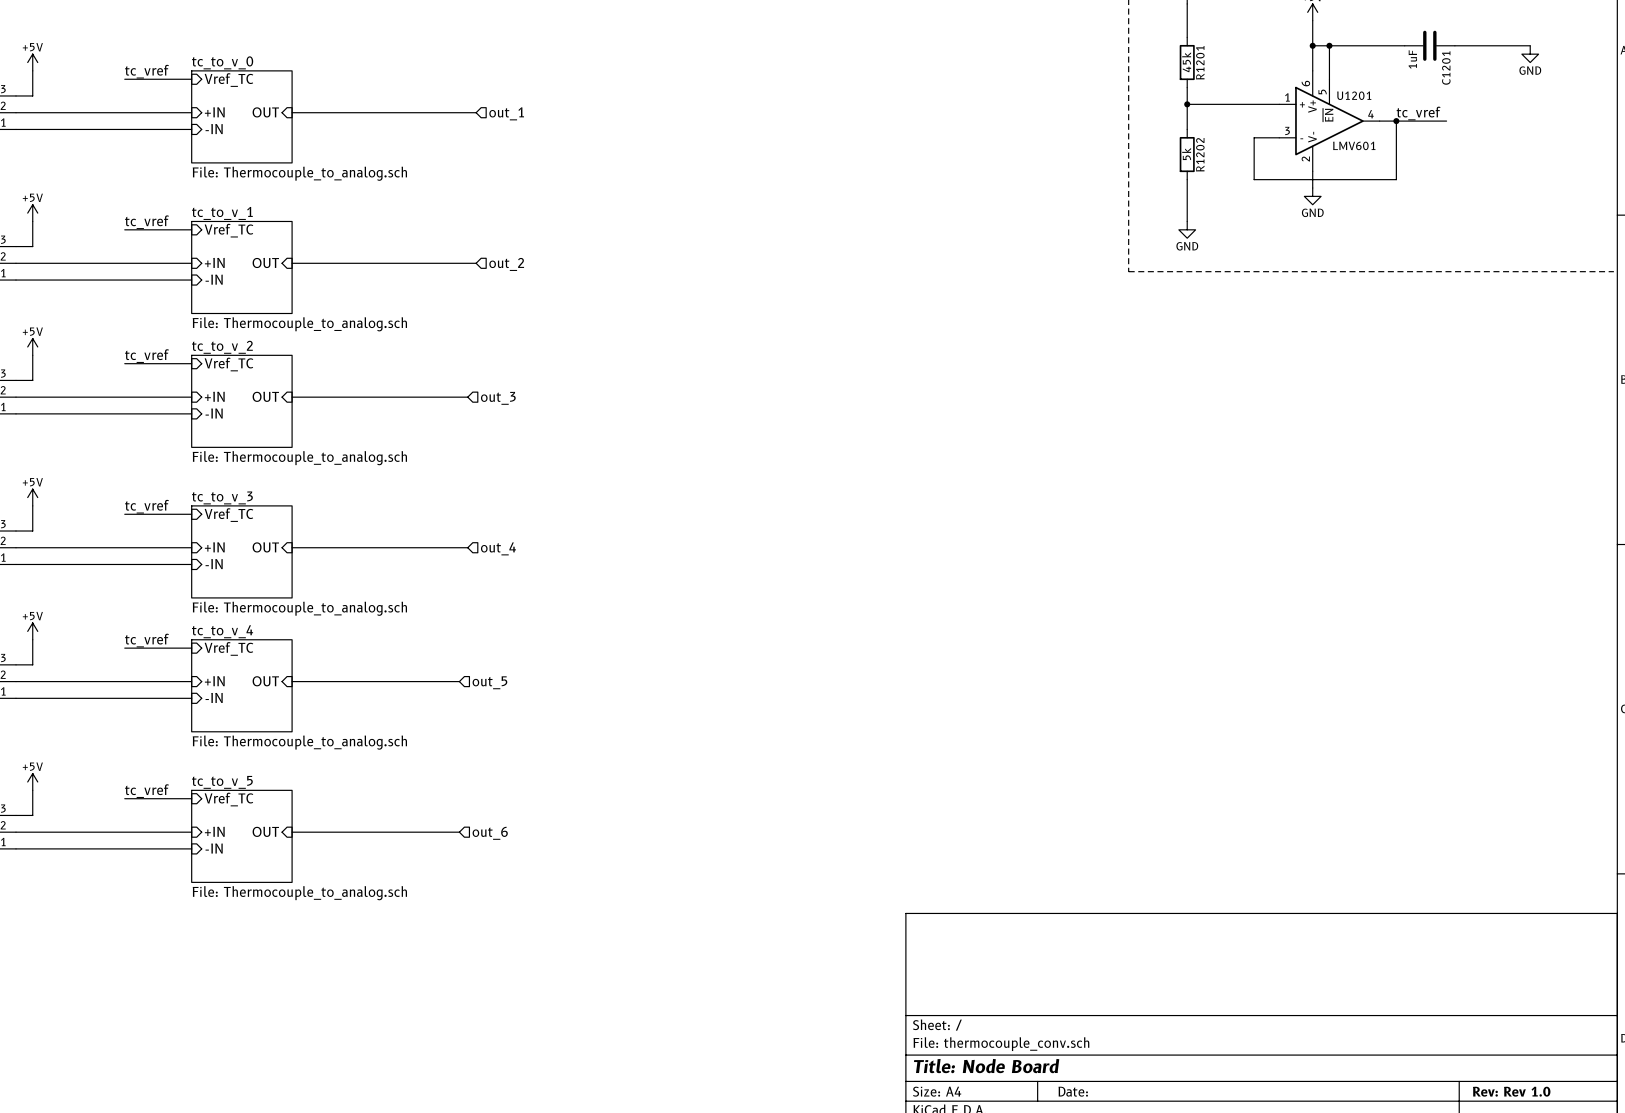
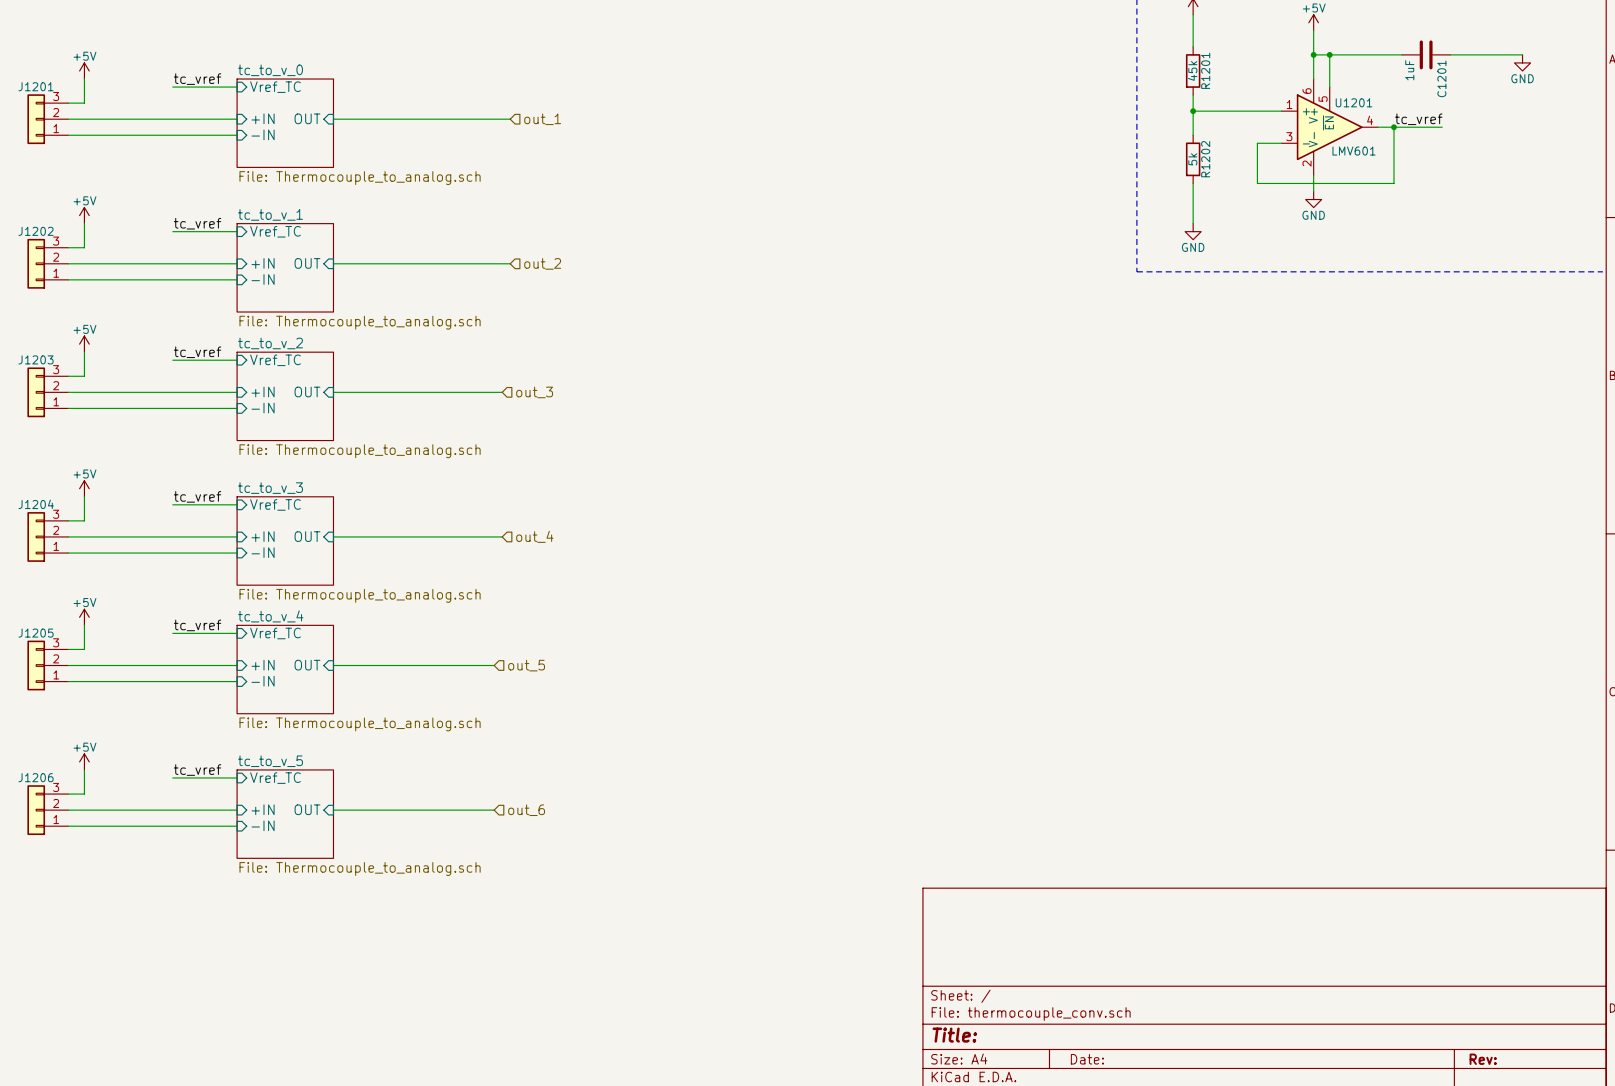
title block: Title: Node Board (986, 1066) -> Title: (954, 1035)
title block: Rev: Rev 1.0 (1511, 1091) -> Rev: (1483, 1059)

